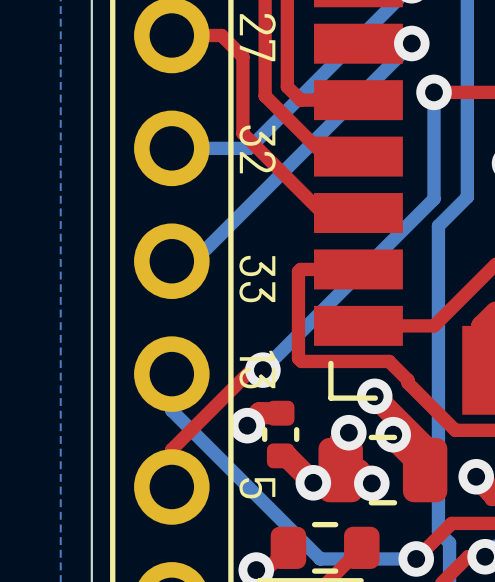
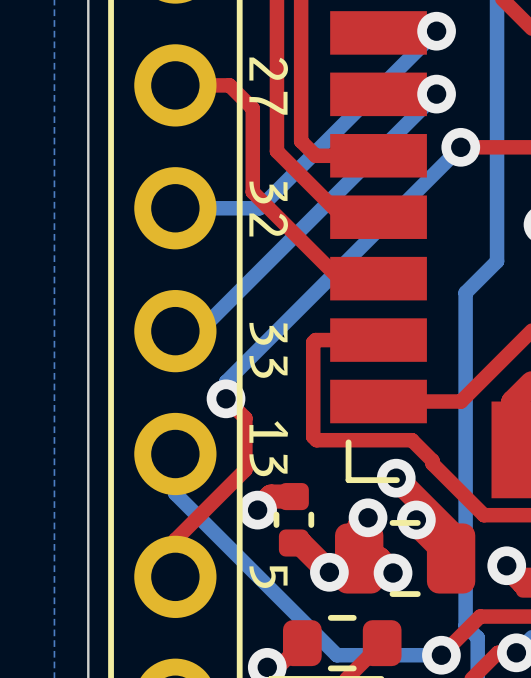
bottom track: (434, 92) (434, 199) (262, 370) -> (460, 147) (226, 382) (226, 398)
top track: (262, 370) (251, 370) (171, 449) (171, 453) -> (226, 398) (245, 418) (245, 469) (175, 539)
via position: (262, 370) -> (226, 398)

